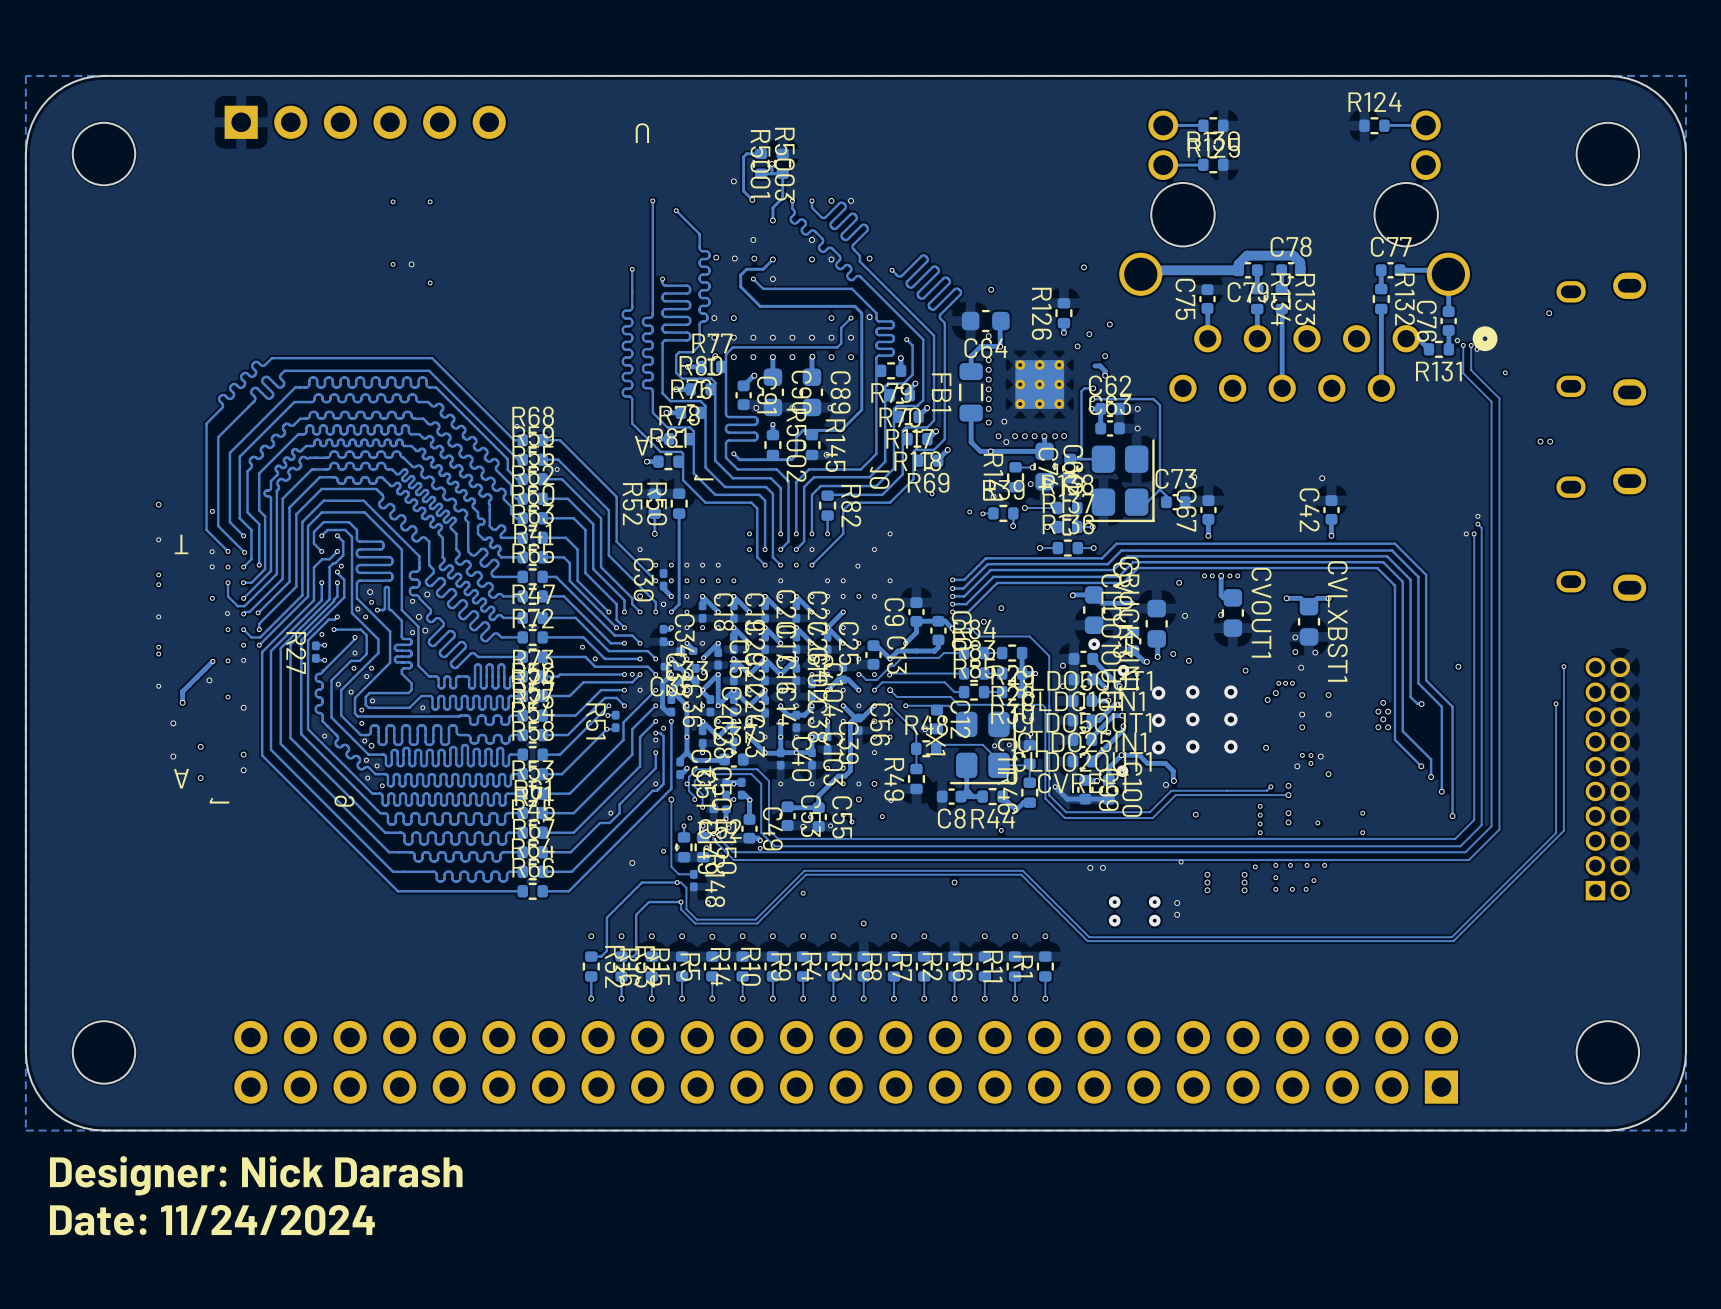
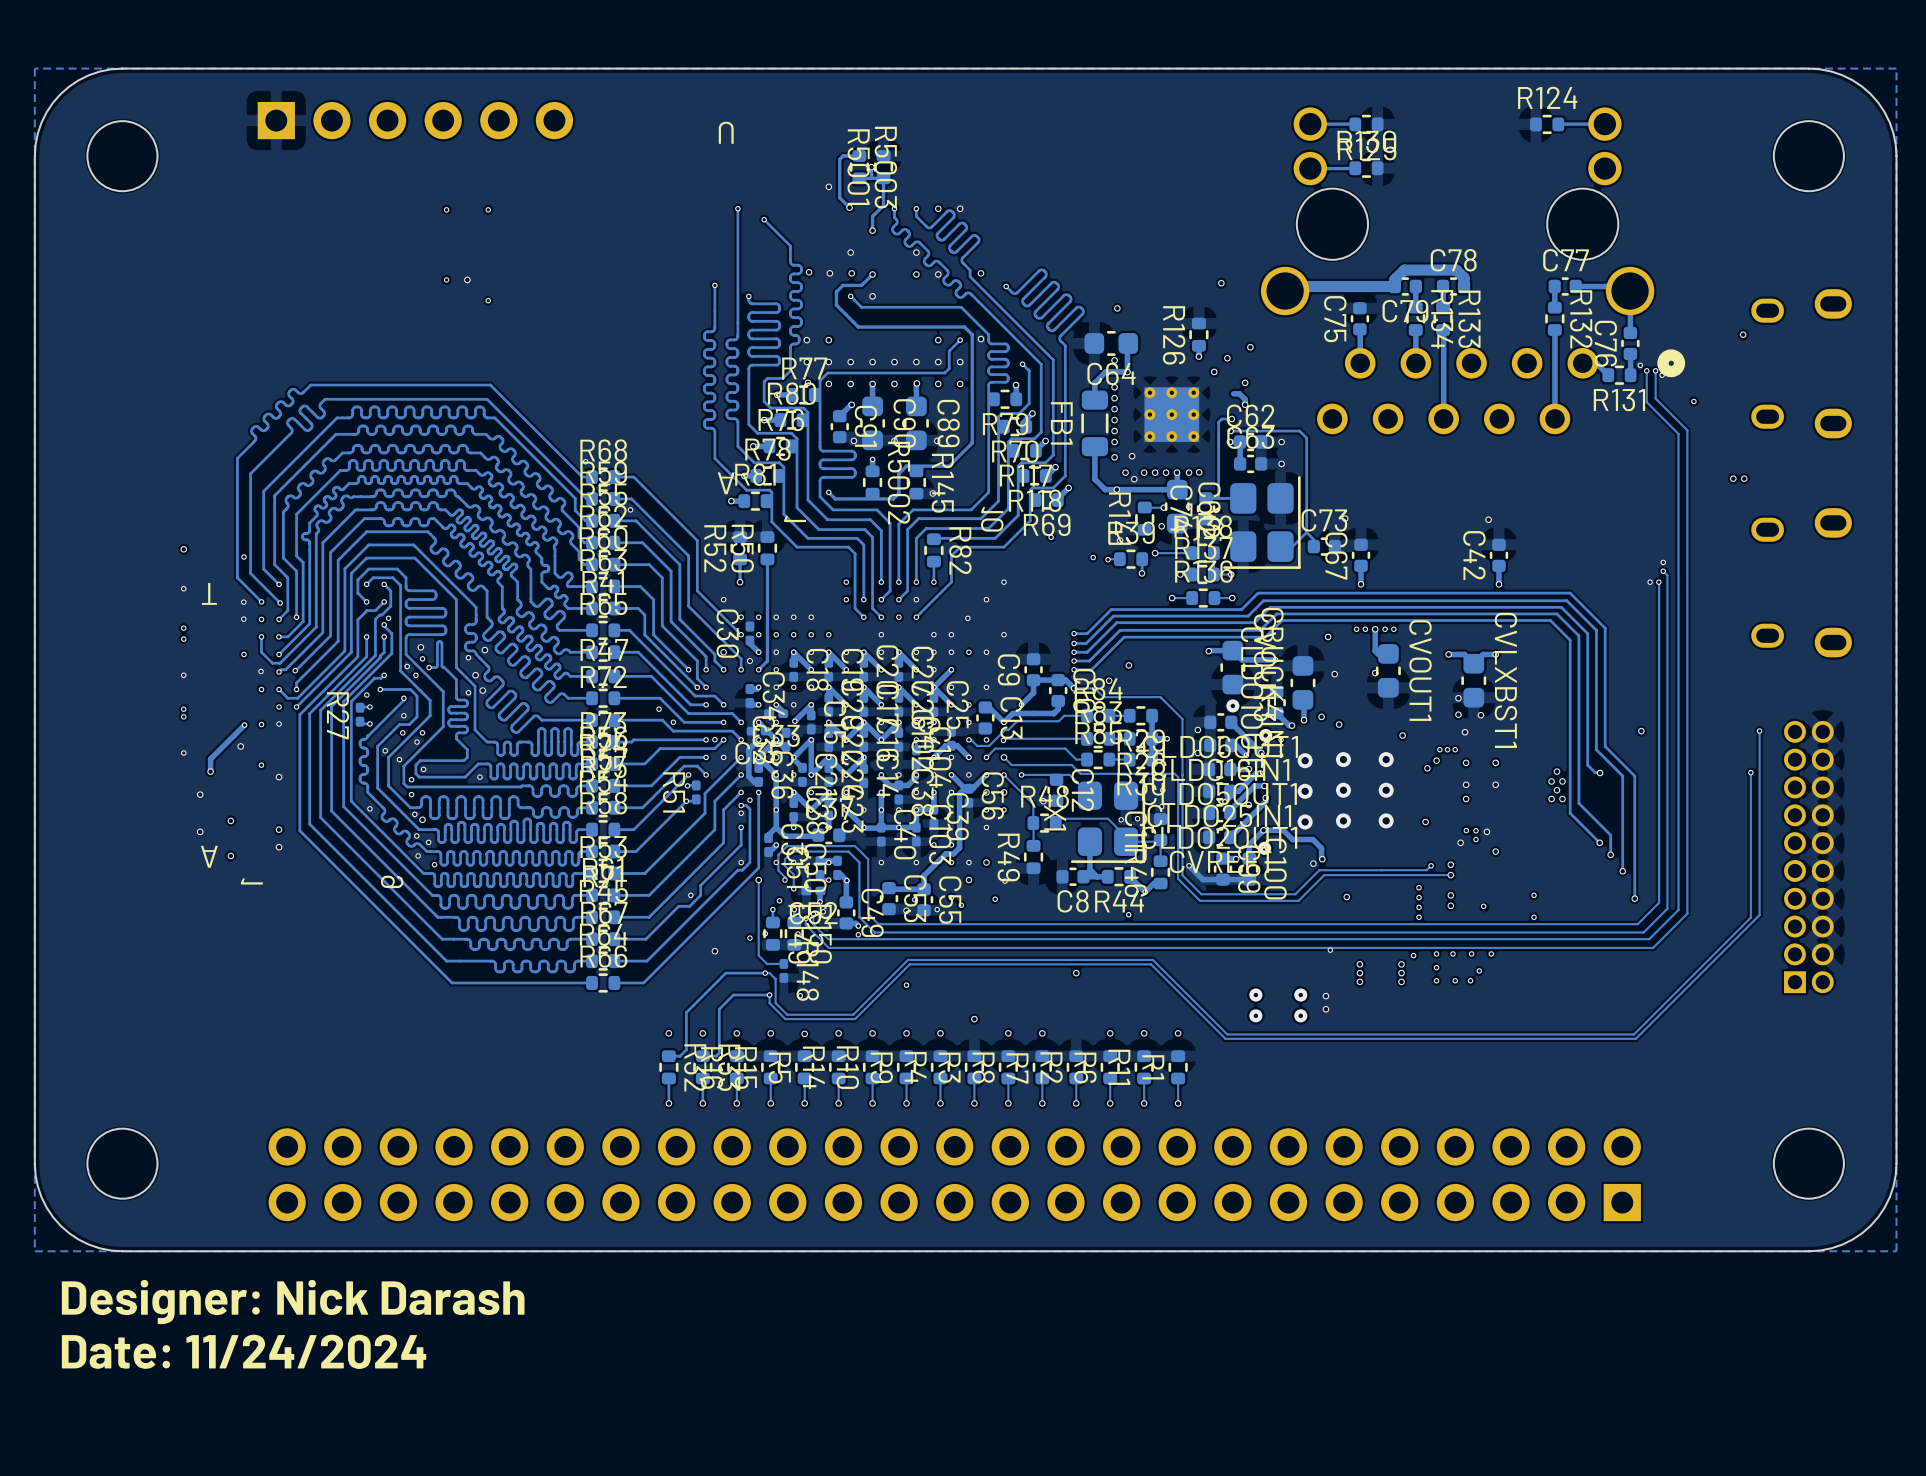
via: (1090, 867) -> none
via: (1102, 867) -> none

